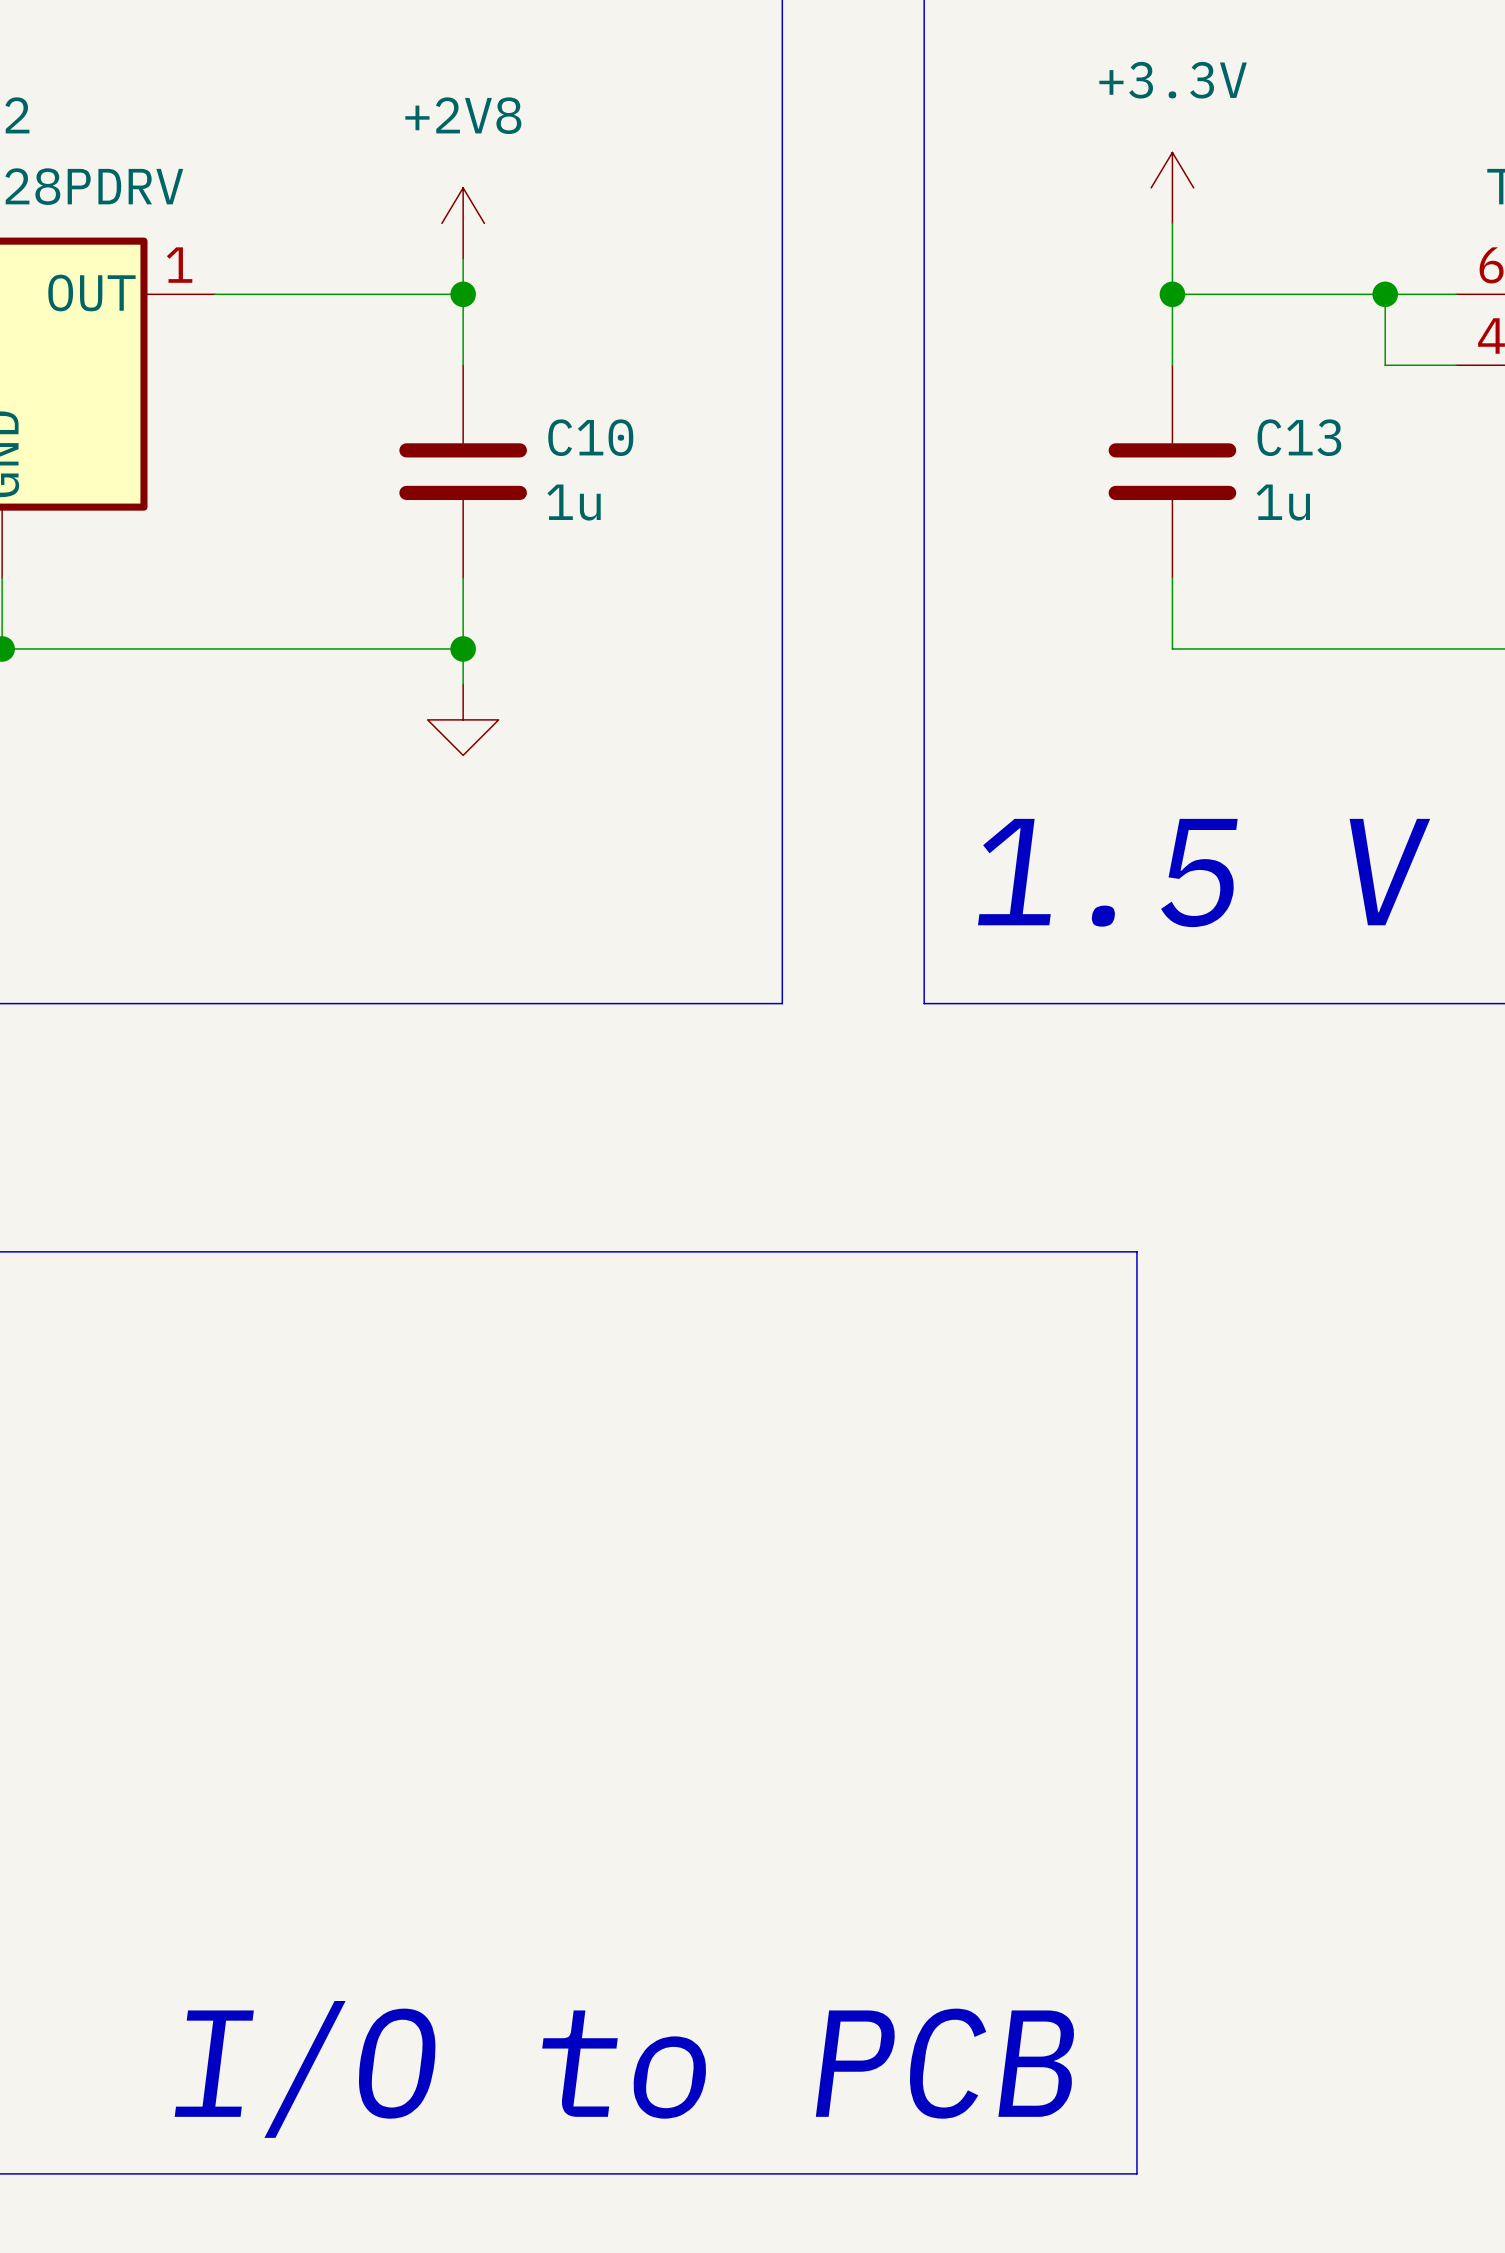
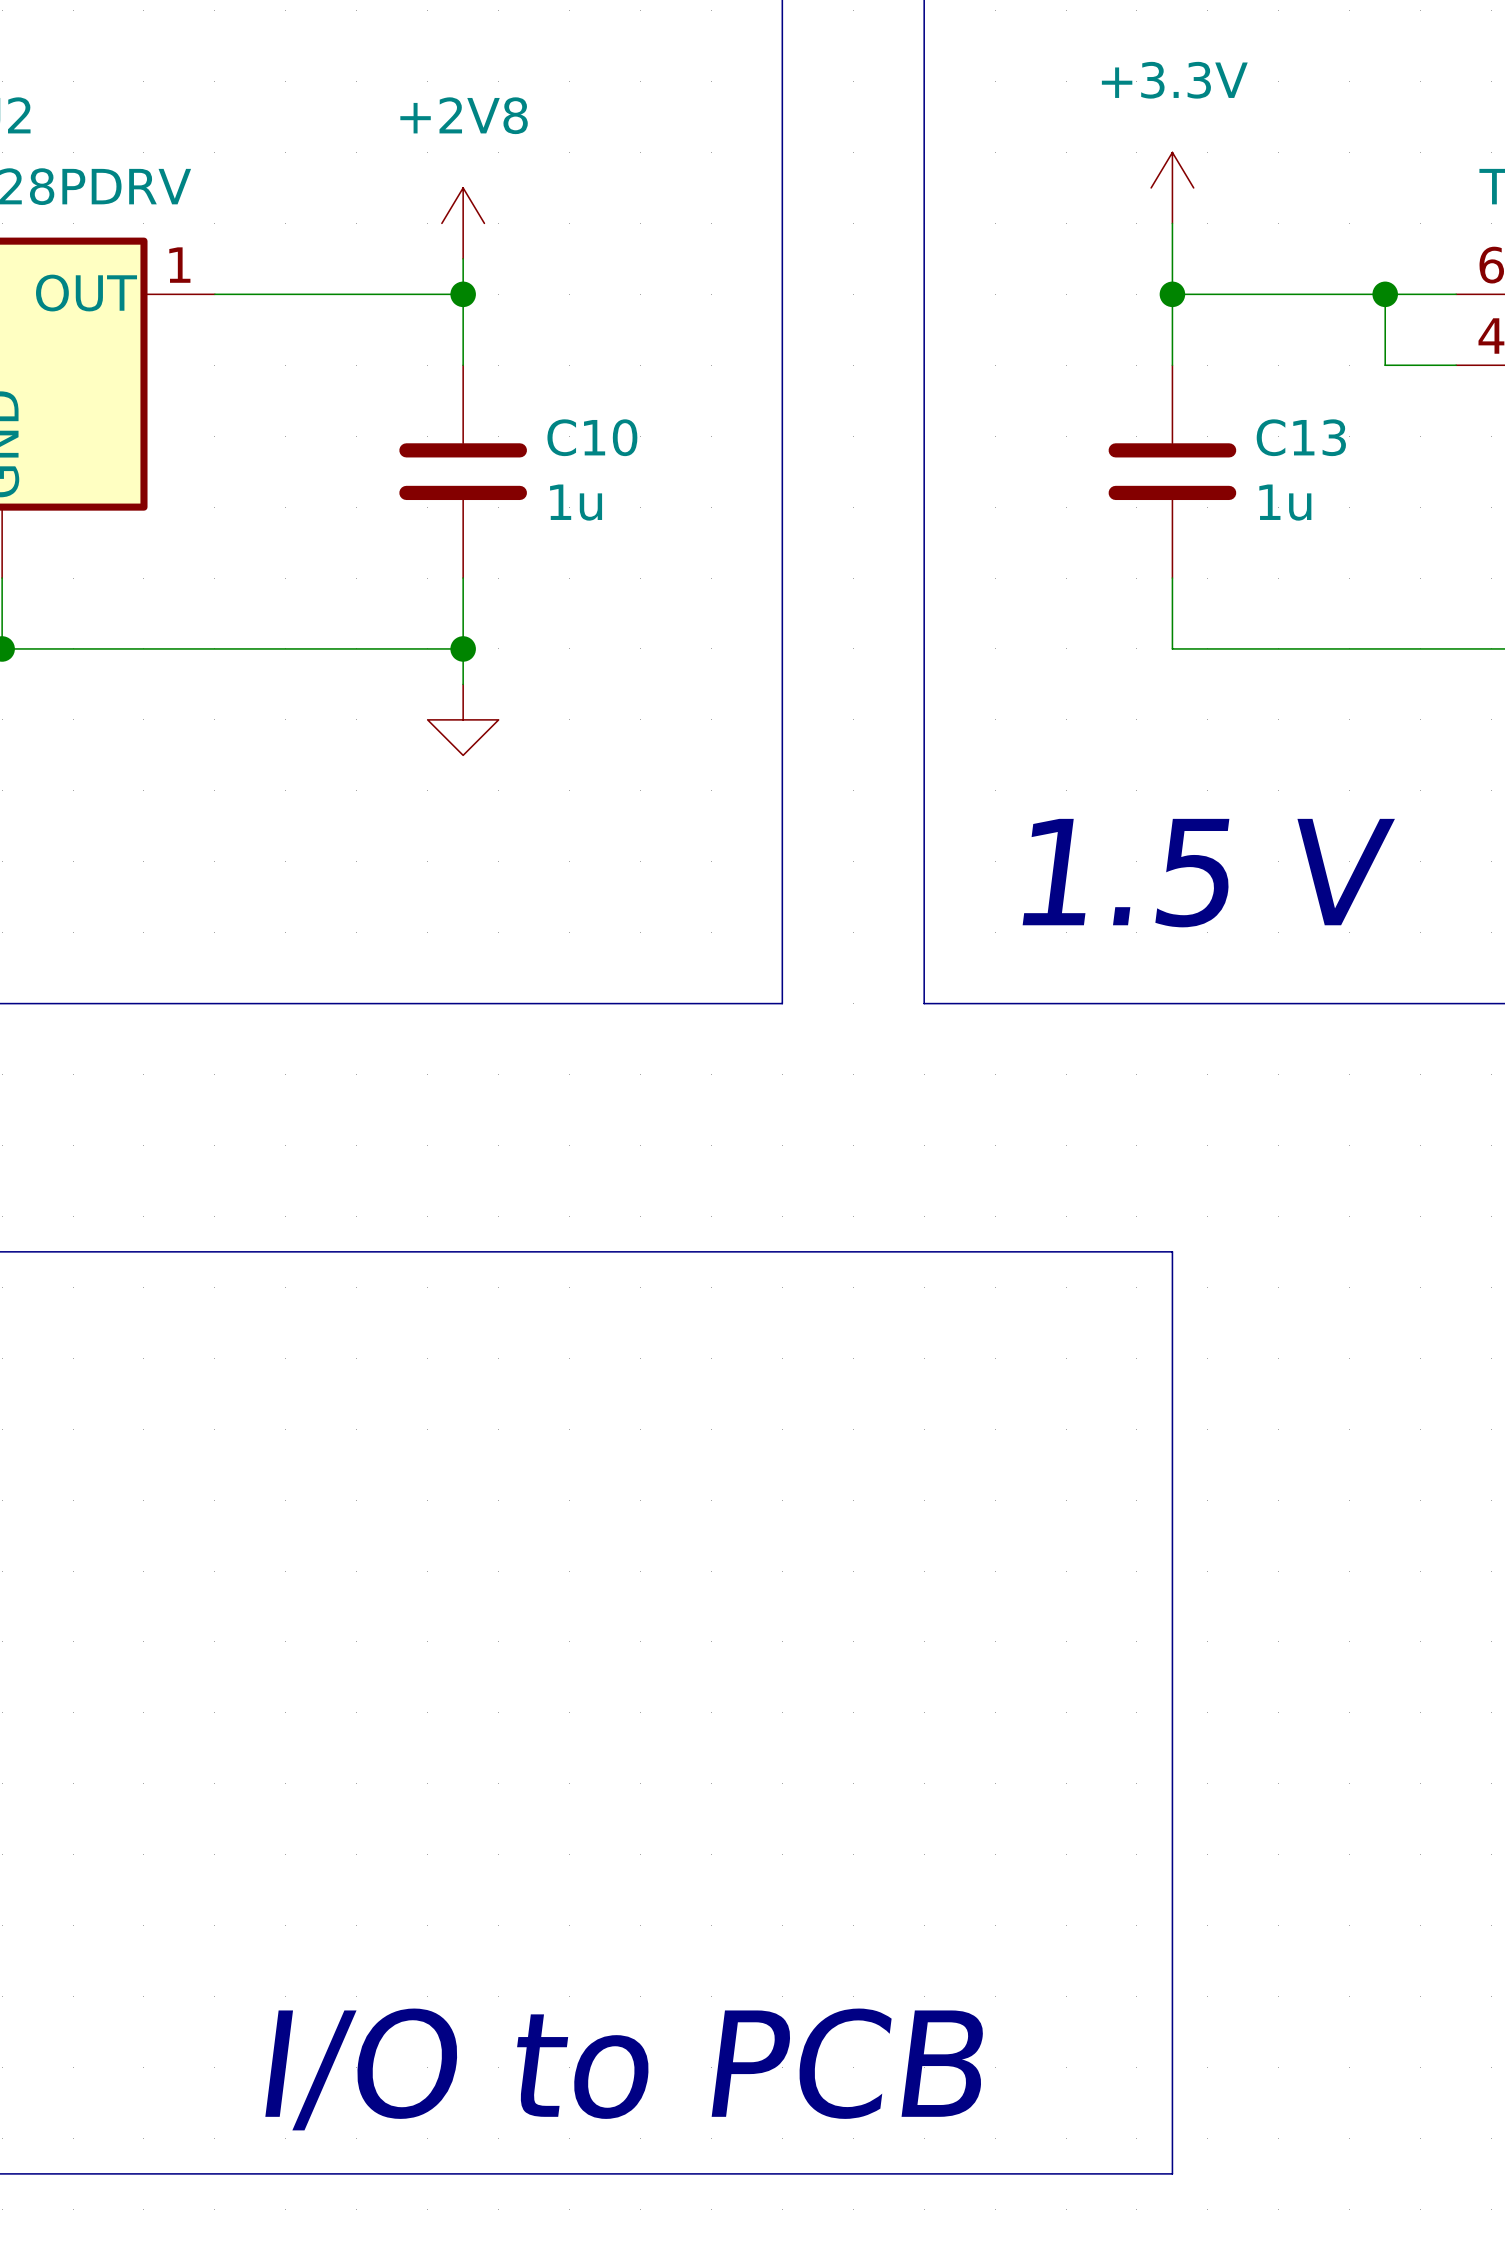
line: (1136, 1251) (1136, 2173) -> (1136, 1251) (1172, 1251) (1172, 2173) (1136, 2173)

